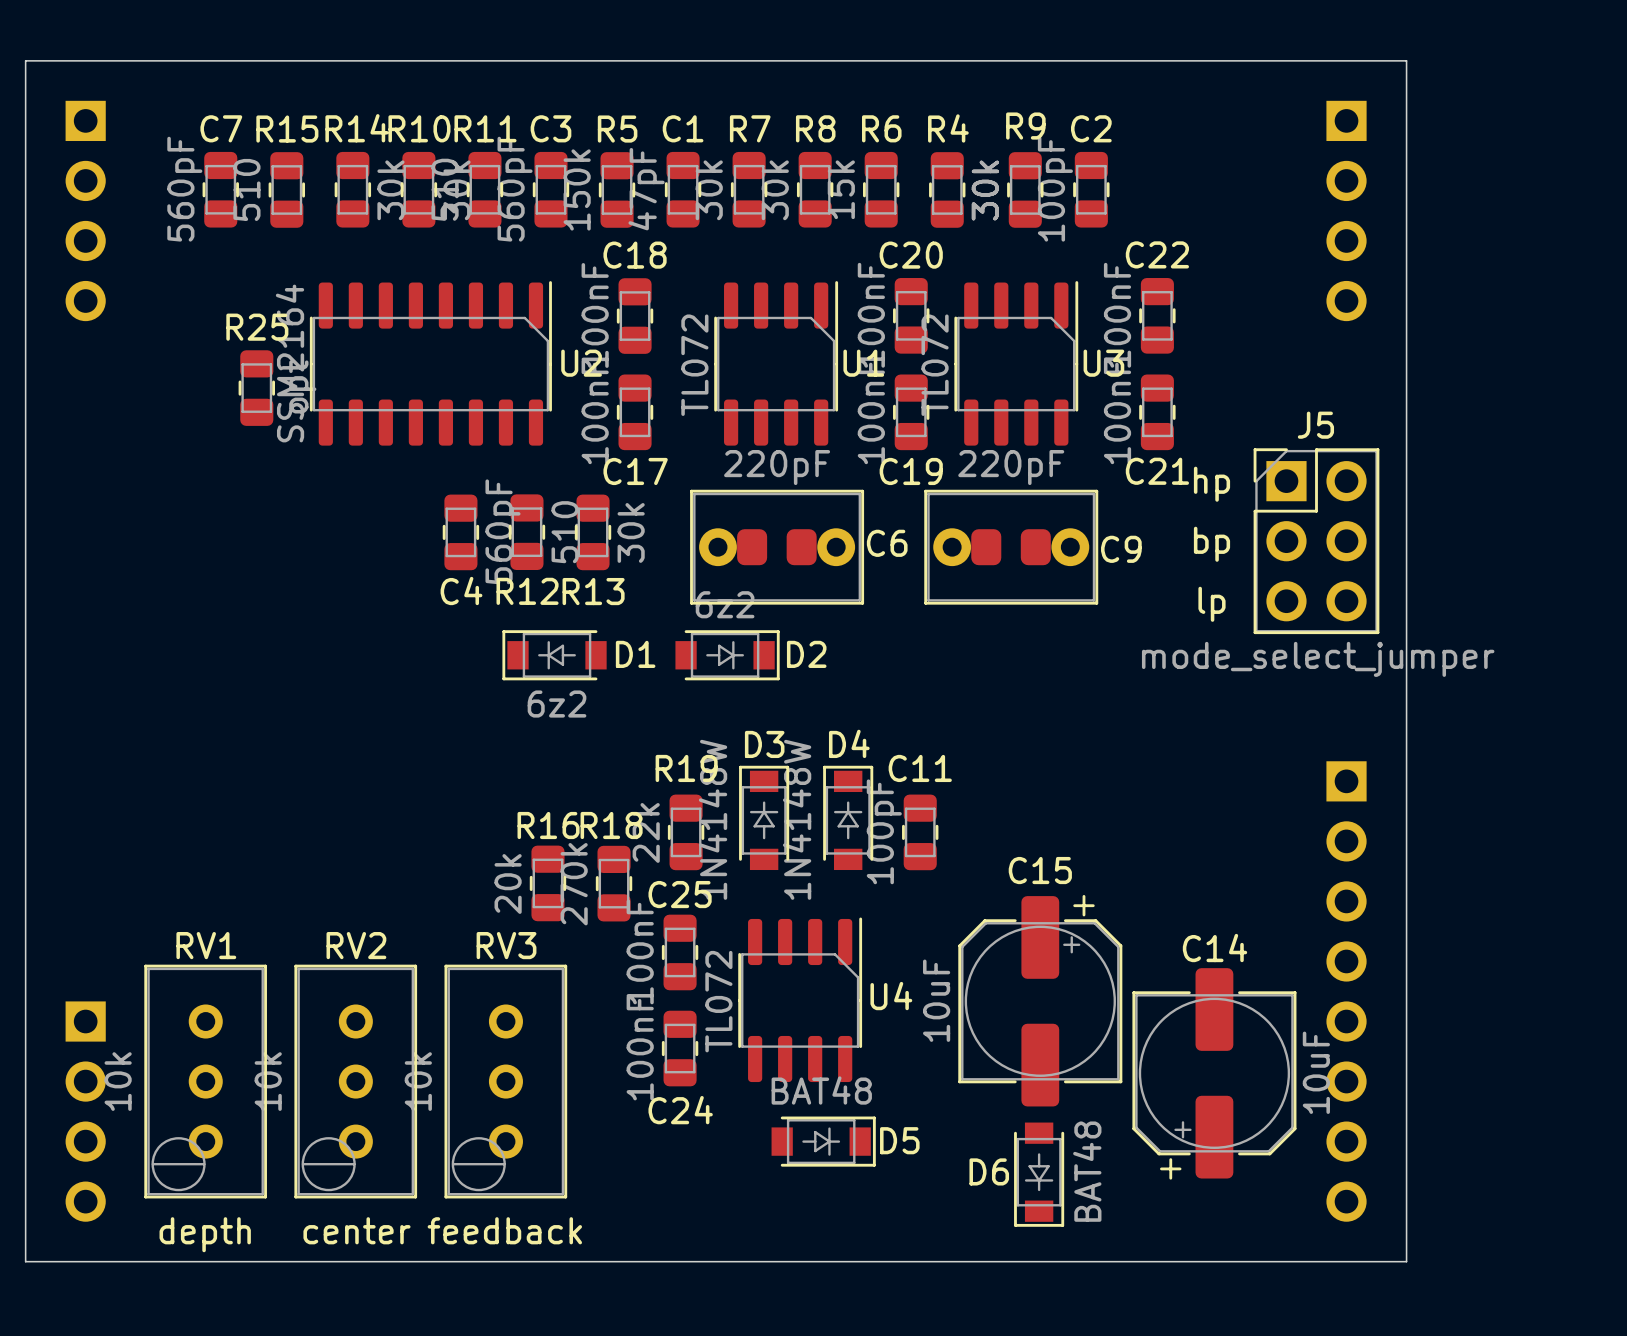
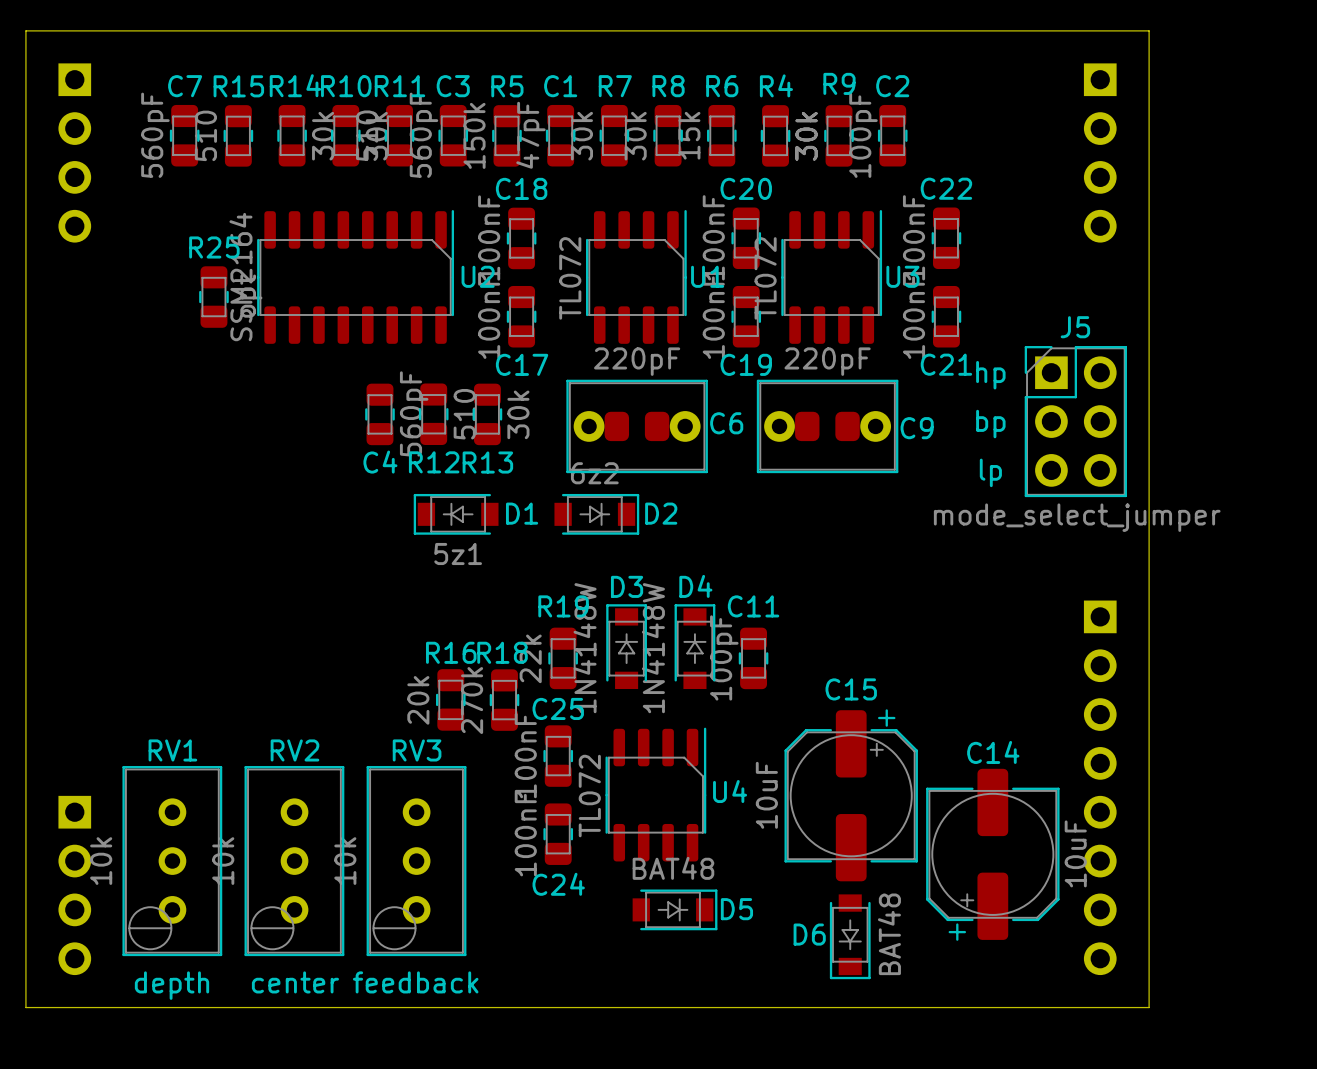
D1 value: 6z2 (557, 704) -> 5z1 (458, 553)

